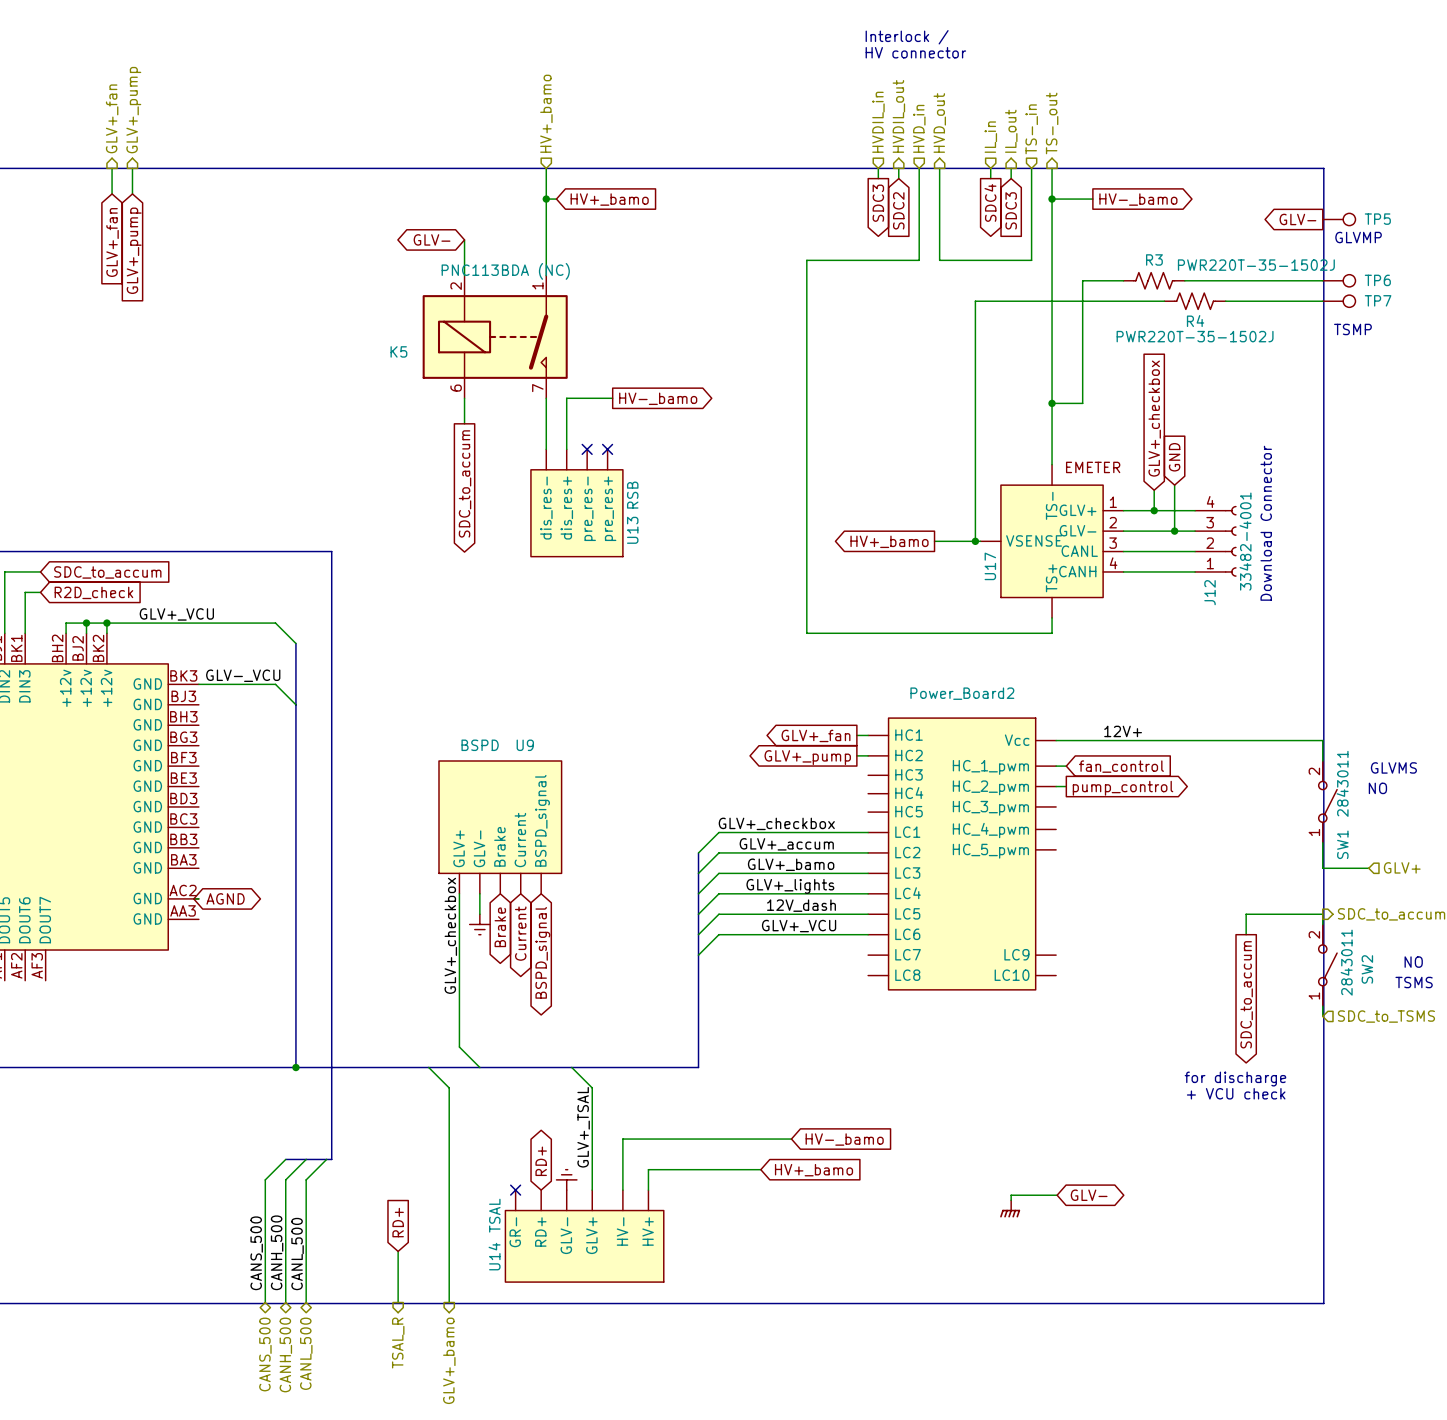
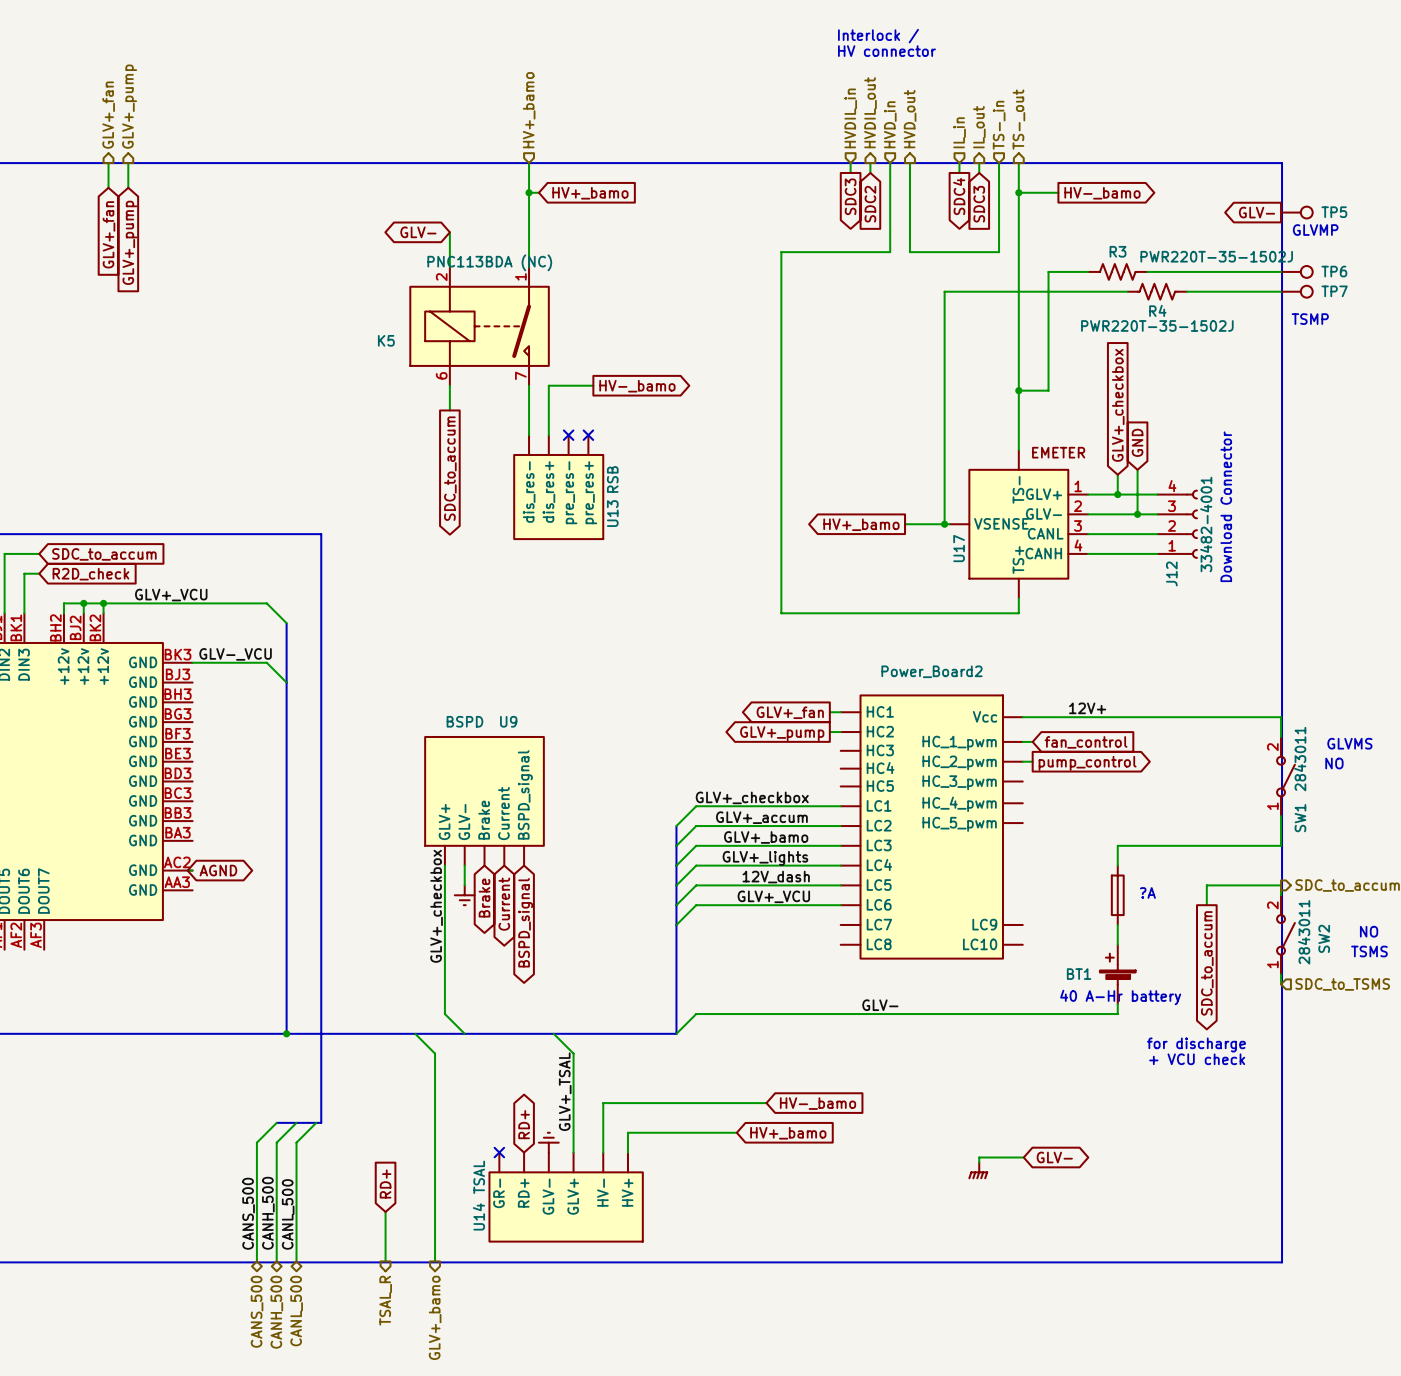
hierarchical label: GLV+ (1402, 867) -> none
wire: (1322, 868) (1368, 868) -> (1281, 840) (1281, 845) (1117, 845) (1117, 865)
text: none -> ?A (1147, 892)
part: none -> (1117, 895)
wire: none -> (1117, 924) (1117, 944)
BT1: none -> (1117, 974)
text: none -> 40 A-Hr battery (1120, 997)
wire: none -> (1117, 1004) (1117, 1014) (696, 1014) (676, 1033)
label: none -> GLV- (880, 1005)

